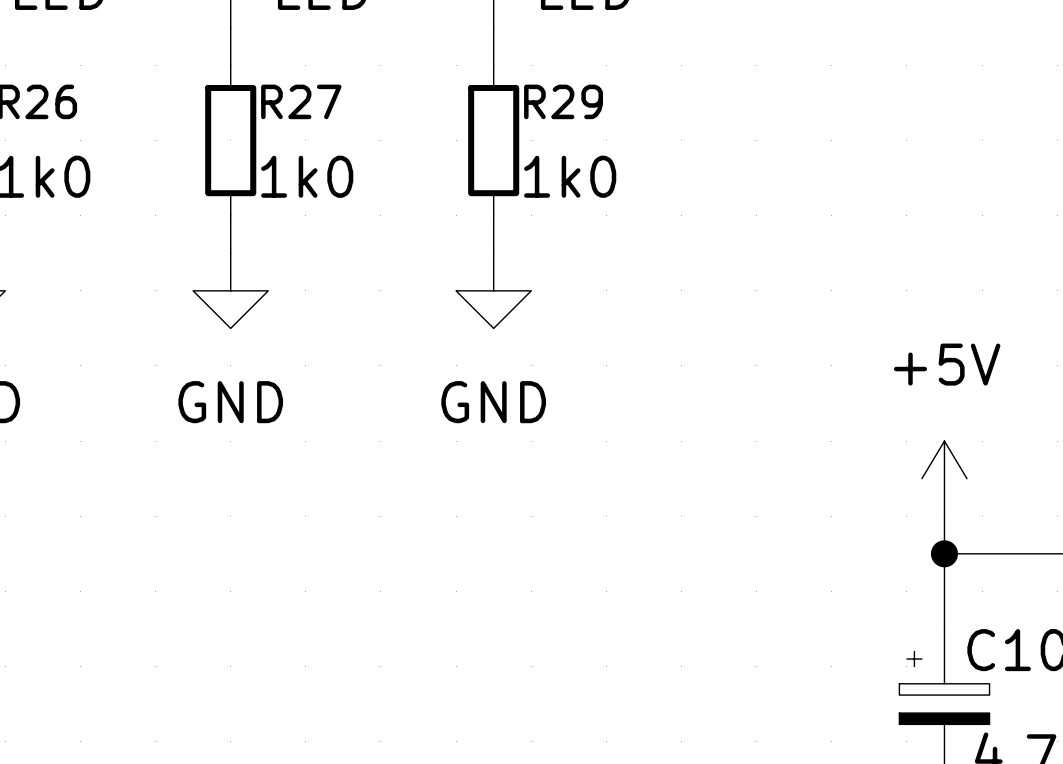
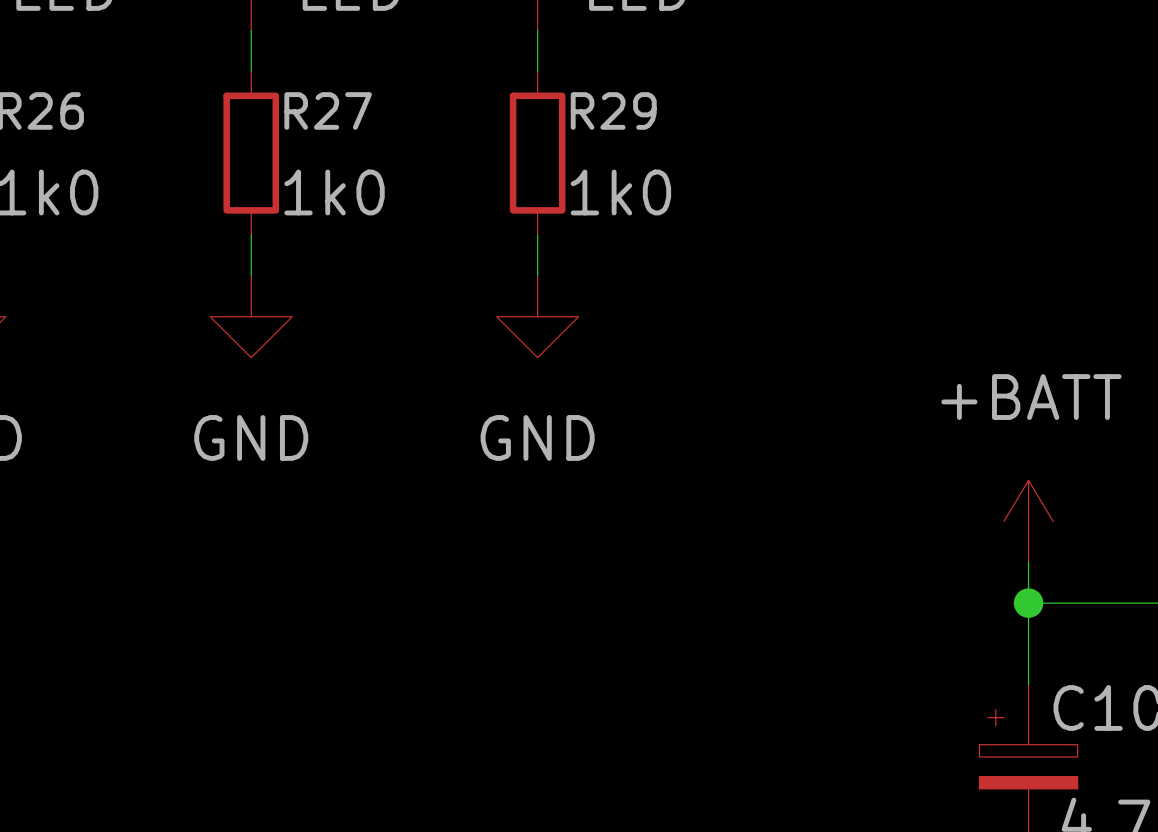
power symbol: +5V (944, 478) -> +BATT (1028, 521)

